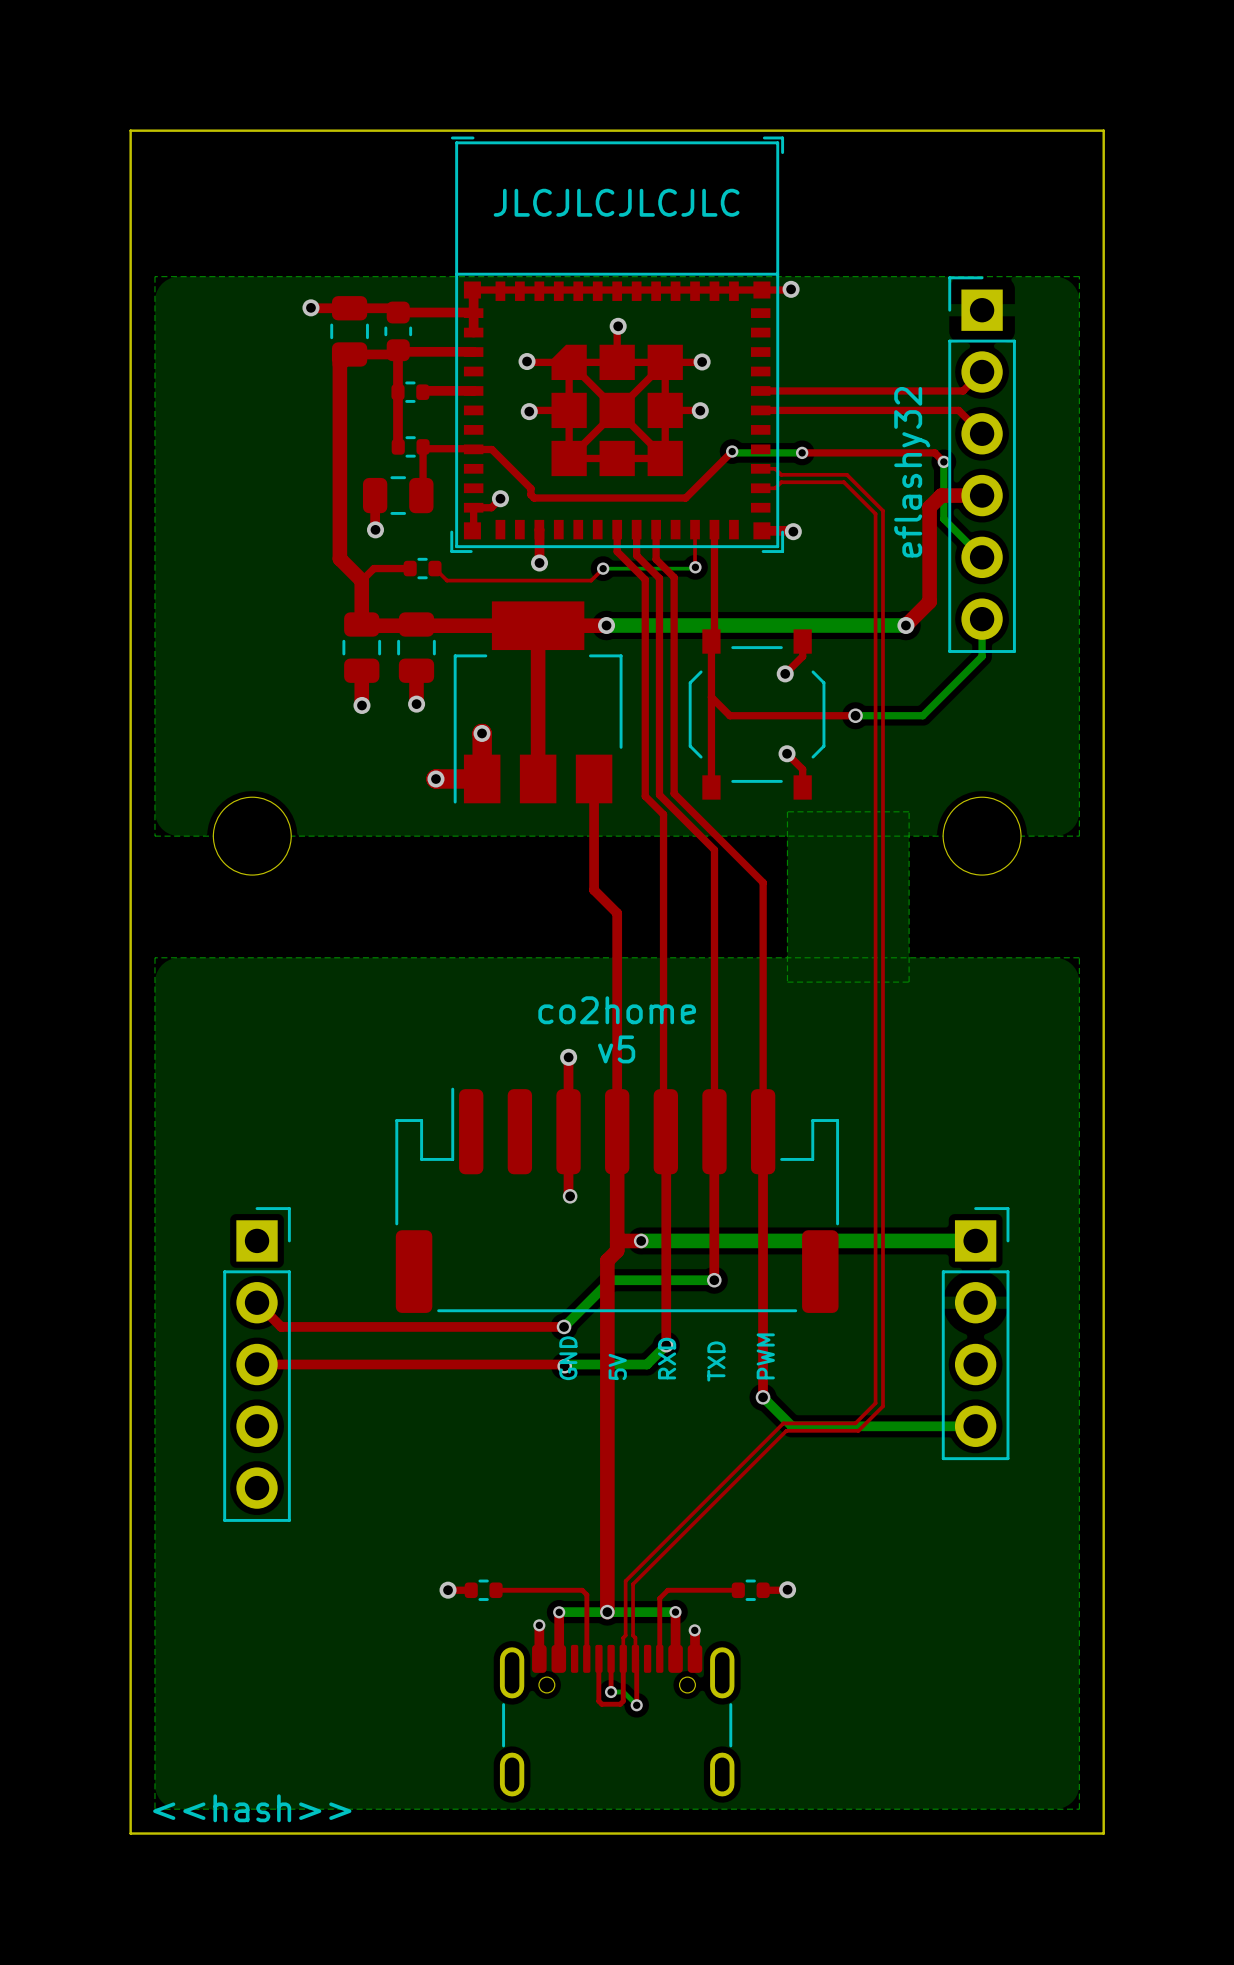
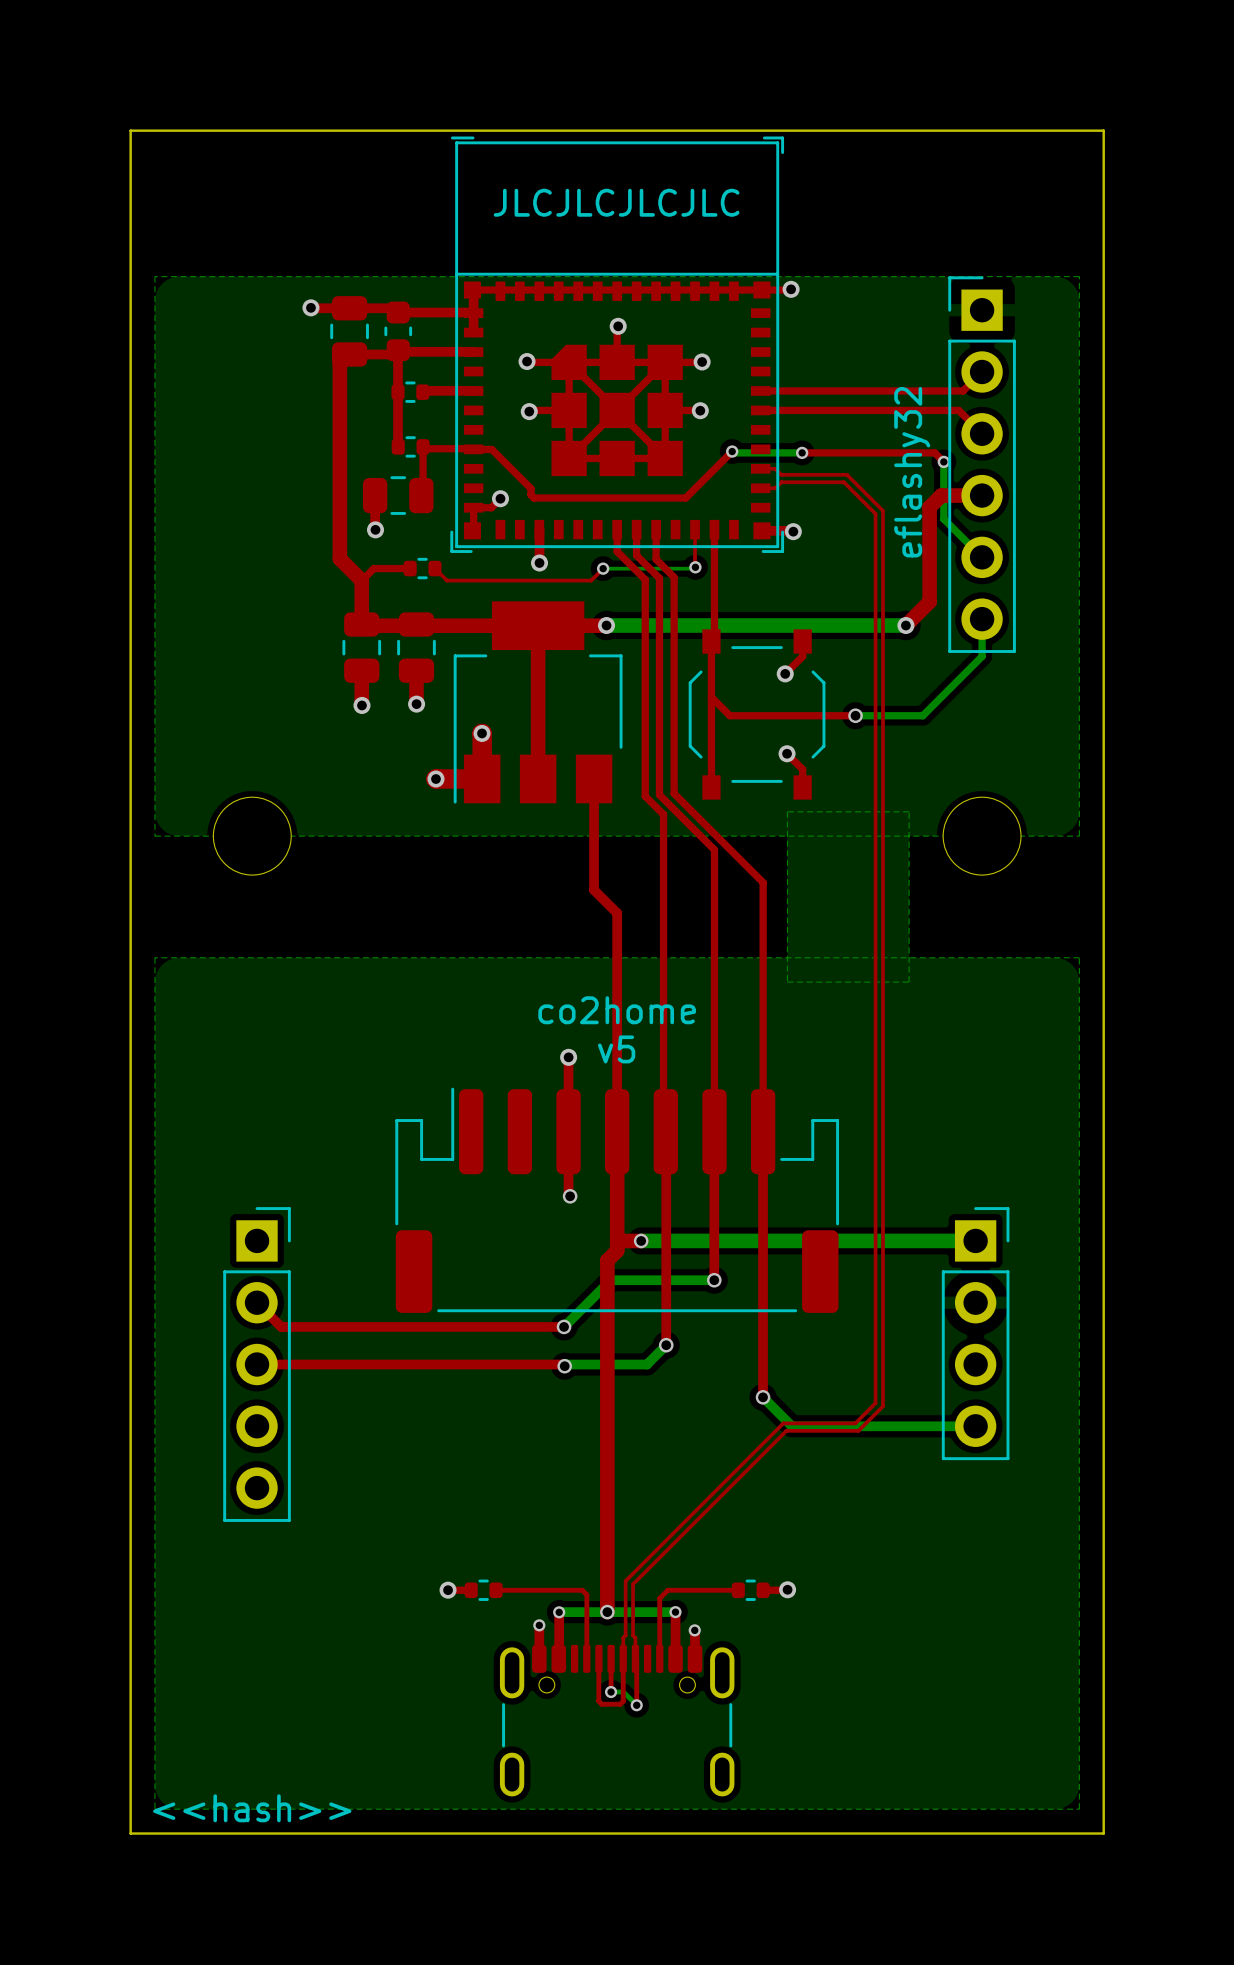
text: PWM (765, 1356) -> none
text: GND (568, 1358) -> none
text: RXD (667, 1358) -> none
text: TXD (716, 1361) -> none
text: 5V (617, 1366) -> none

